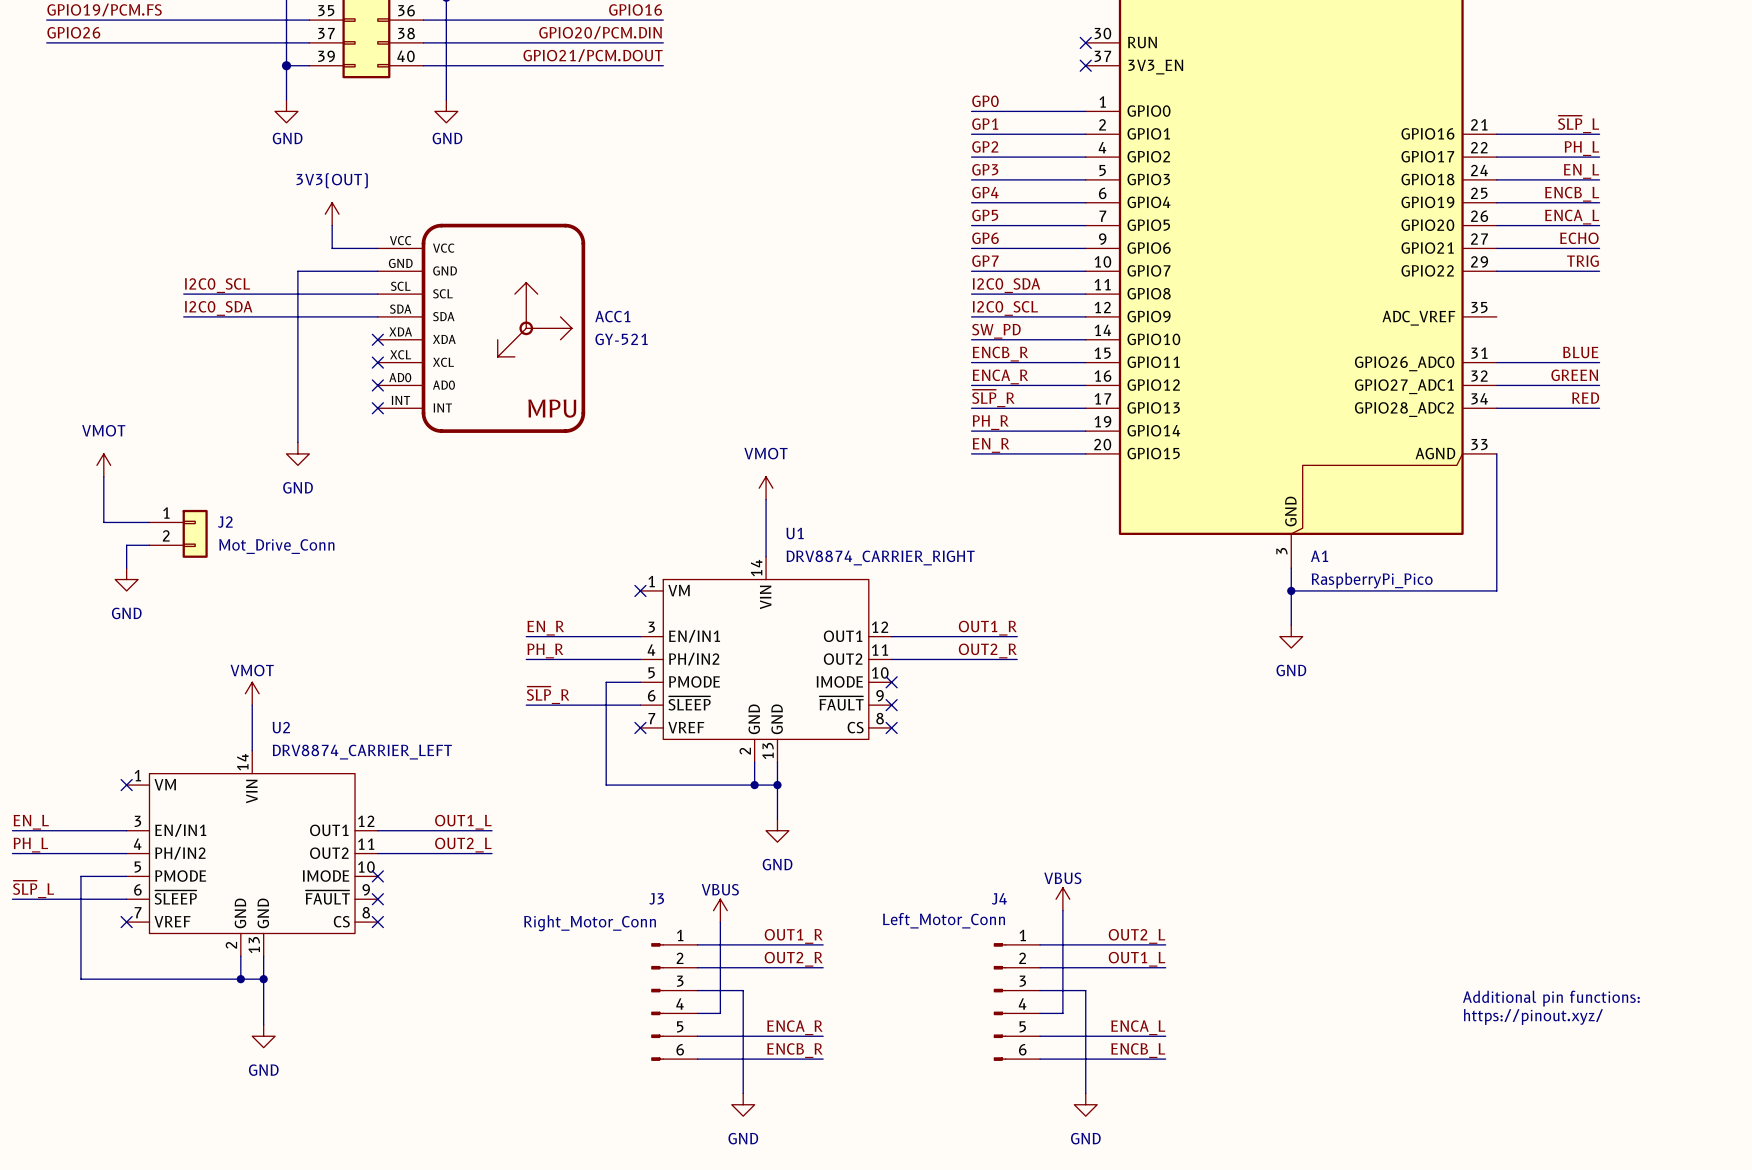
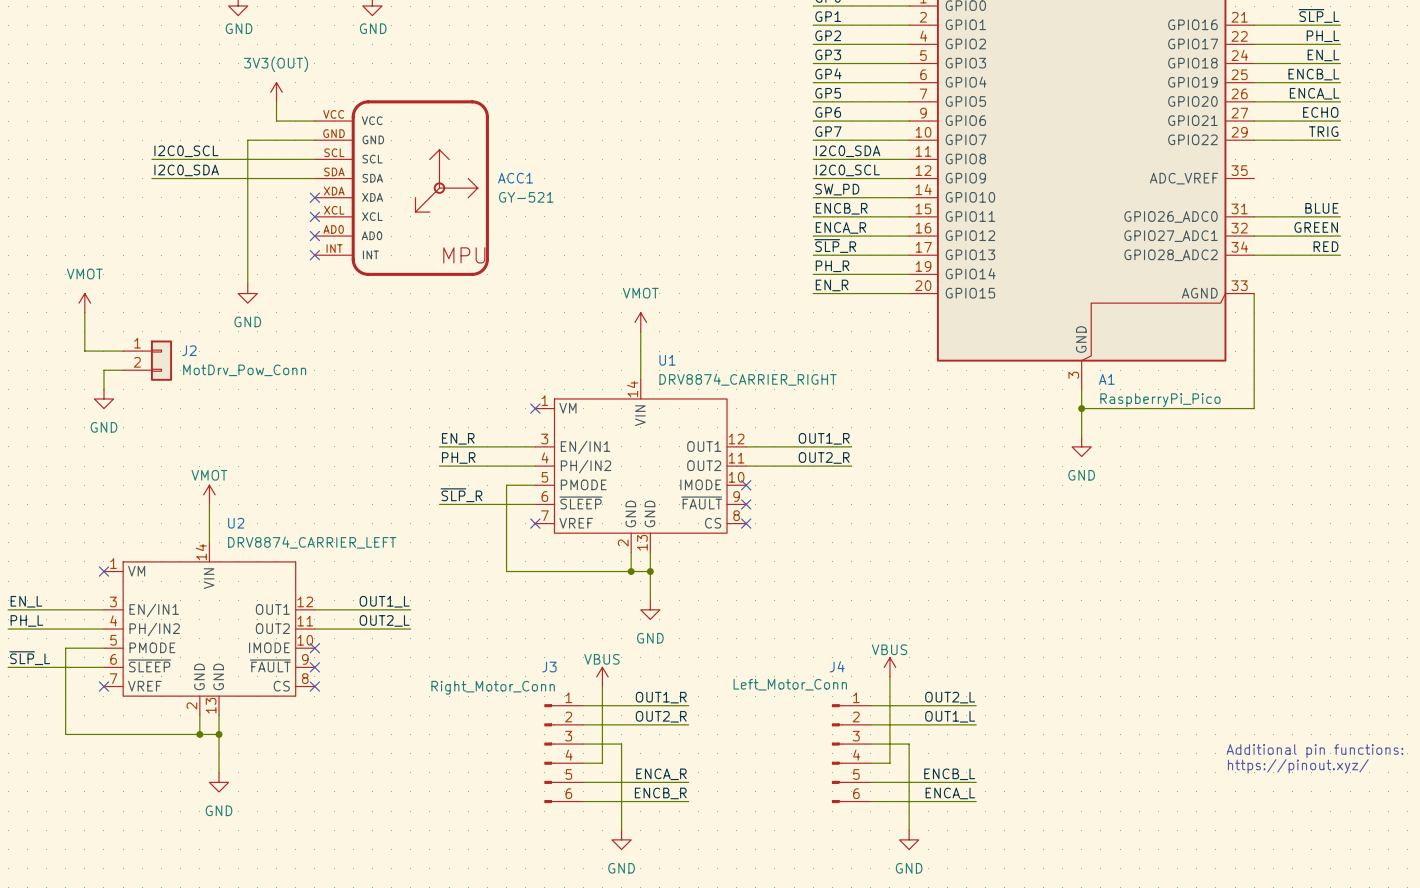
J2 value: Mot_Drive_Conn (276, 546) -> MotDrv_Pow_Conn (244, 370)
label: ENCA_L (1138, 1027) -> ENCB_L (949, 774)
label: ENCB_L (1138, 1050) -> ENCA_L (950, 793)

